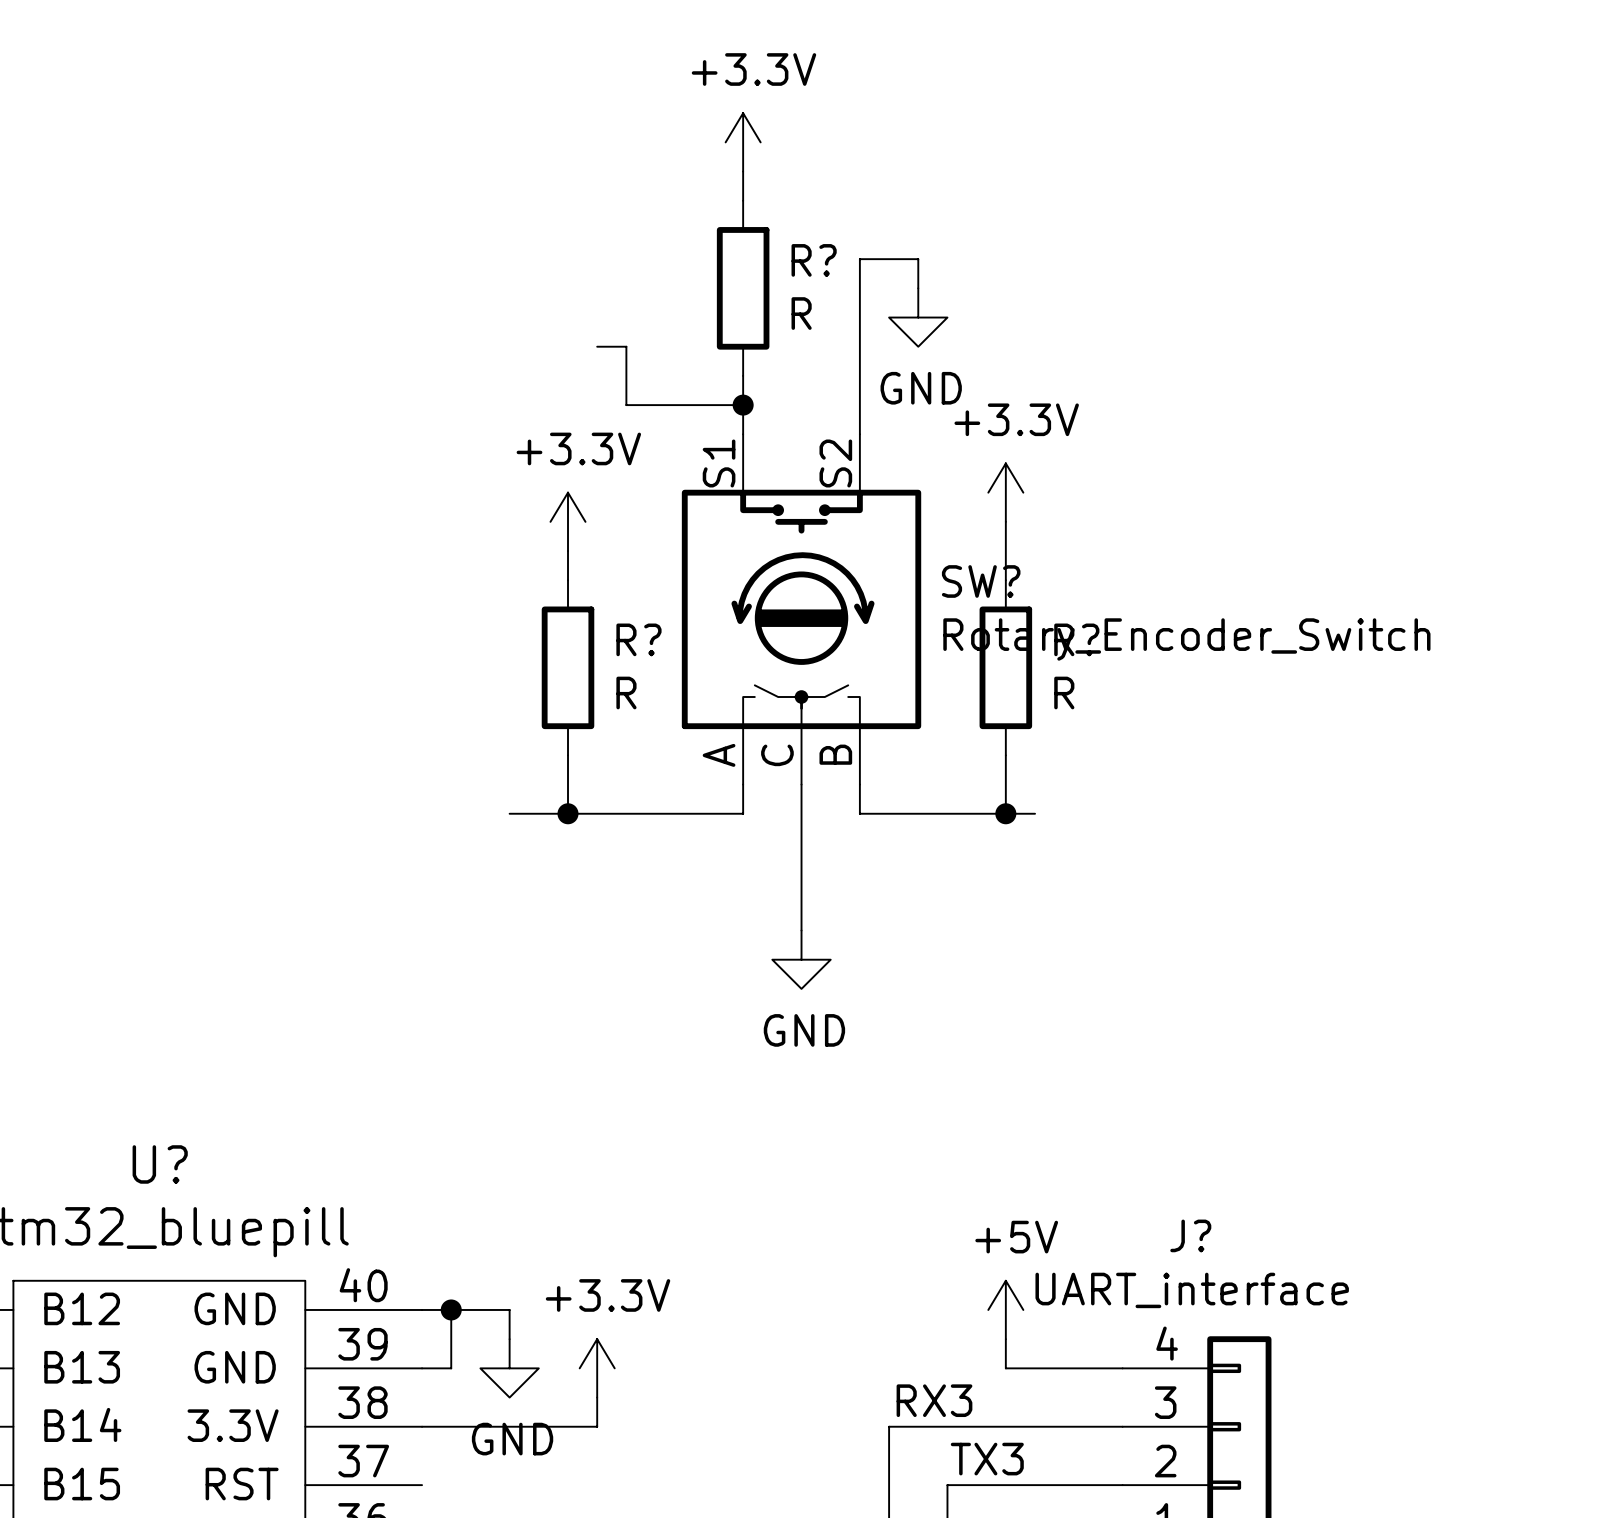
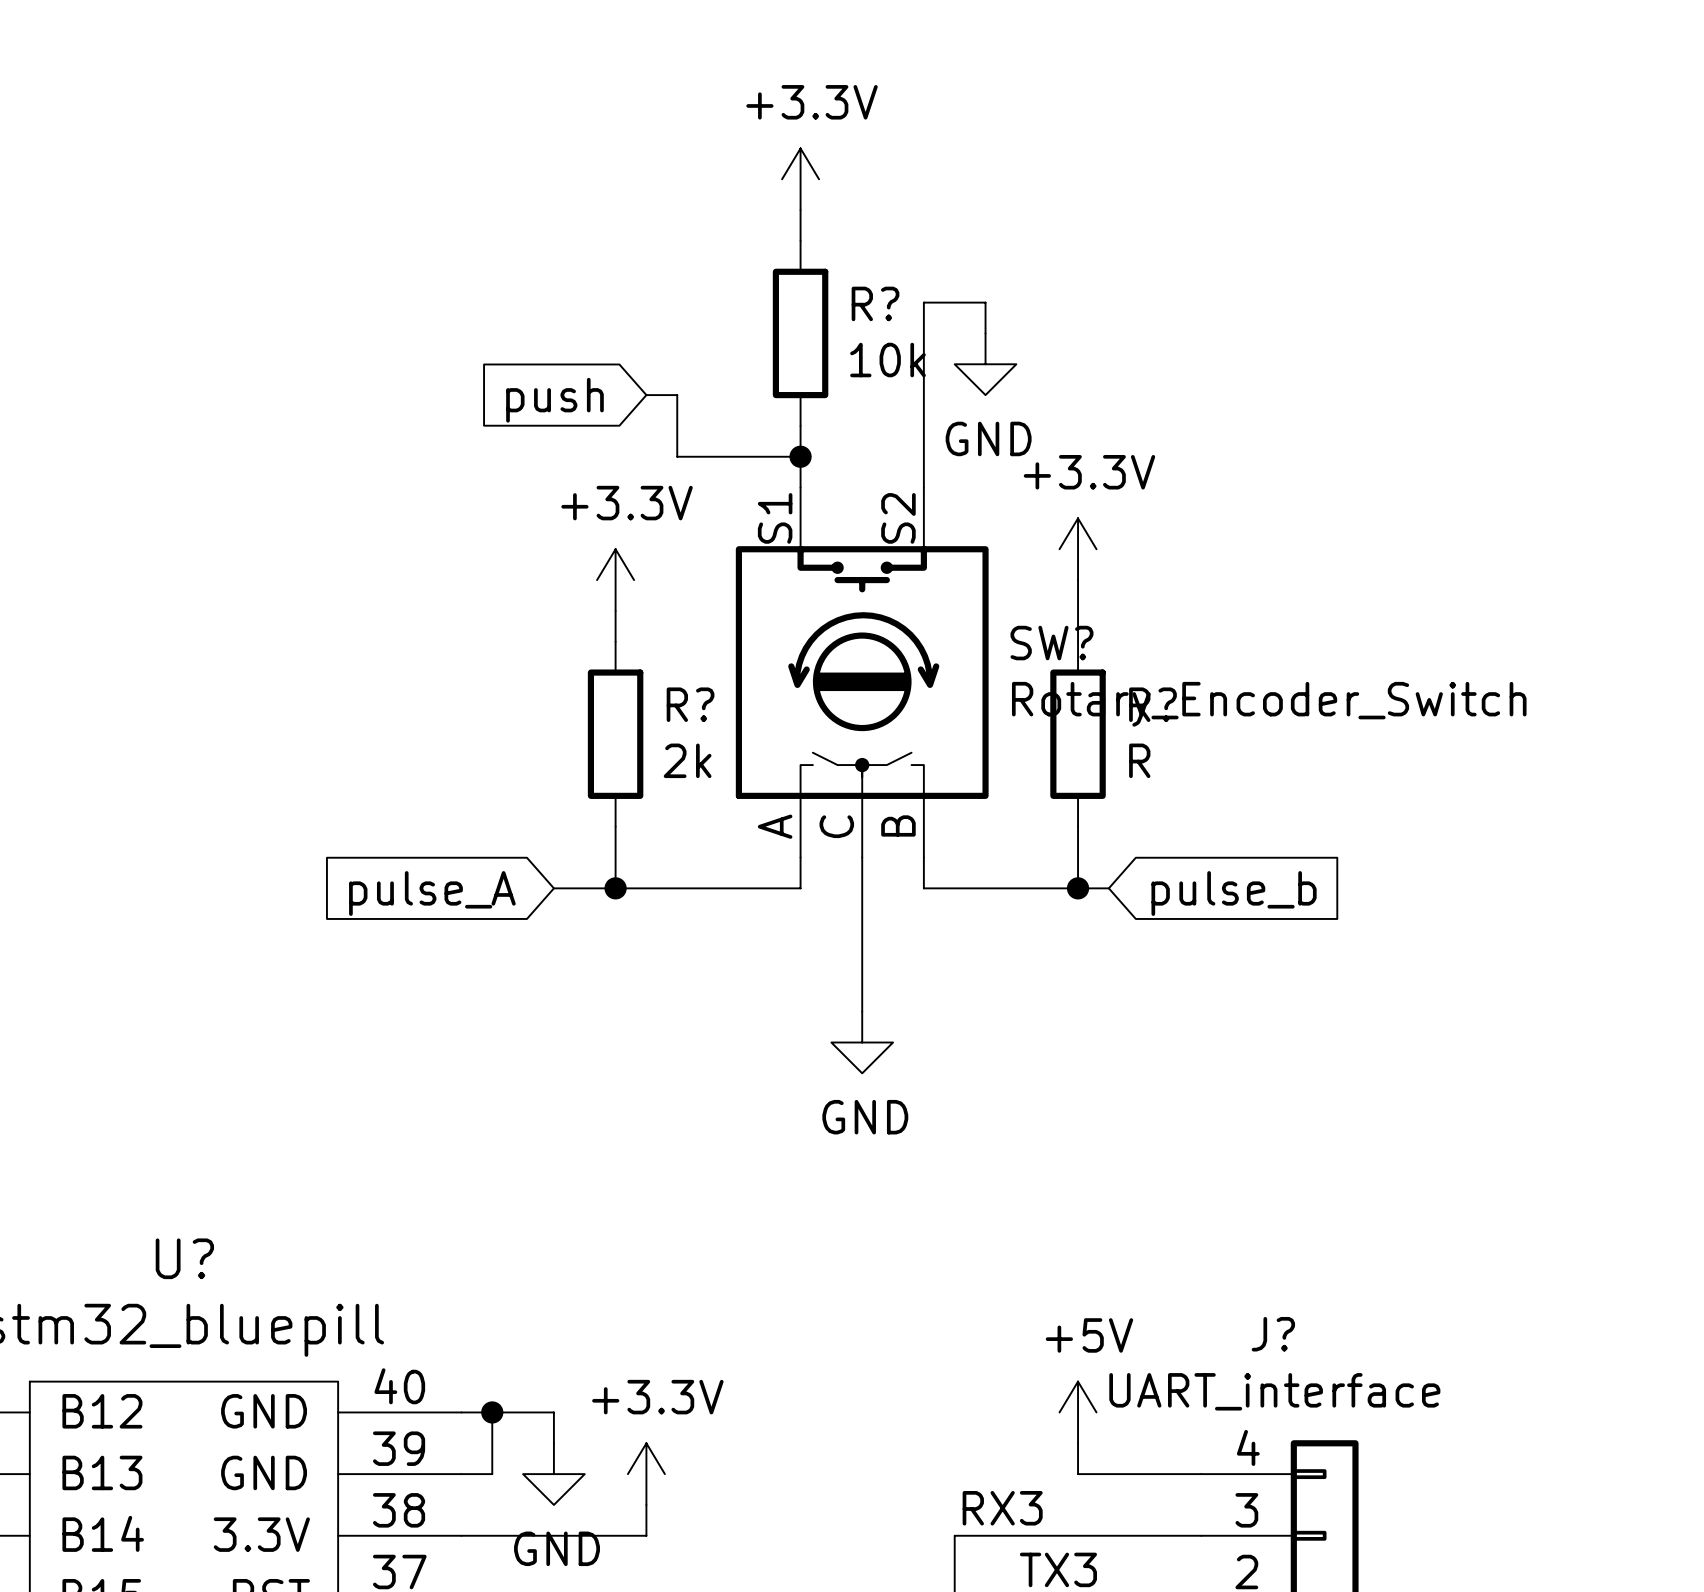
R? value: R (801, 313) -> 10k (888, 360)
global label: none -> push (554, 400)
R? value: R (626, 692) -> 2k (687, 760)
global label: none -> pulse_A (432, 893)
global label: none -> pulse_b (1234, 893)

